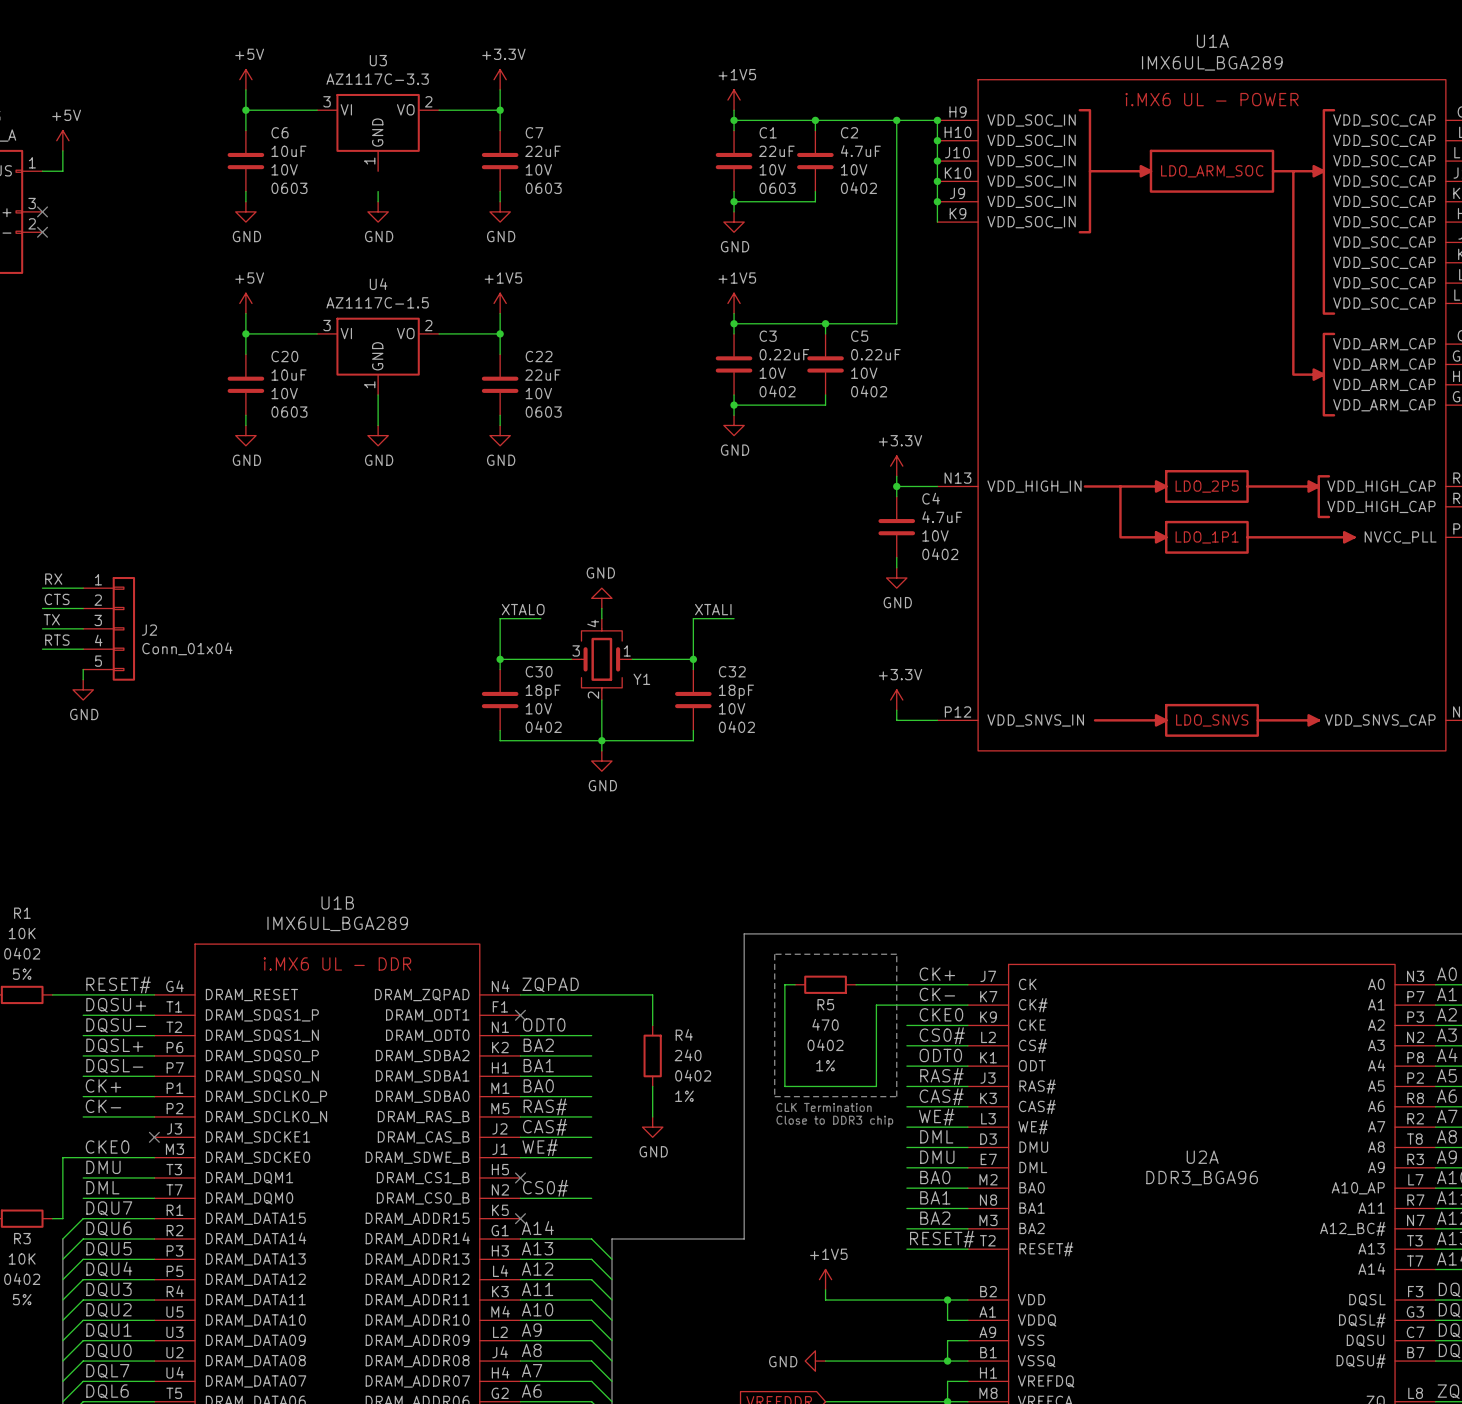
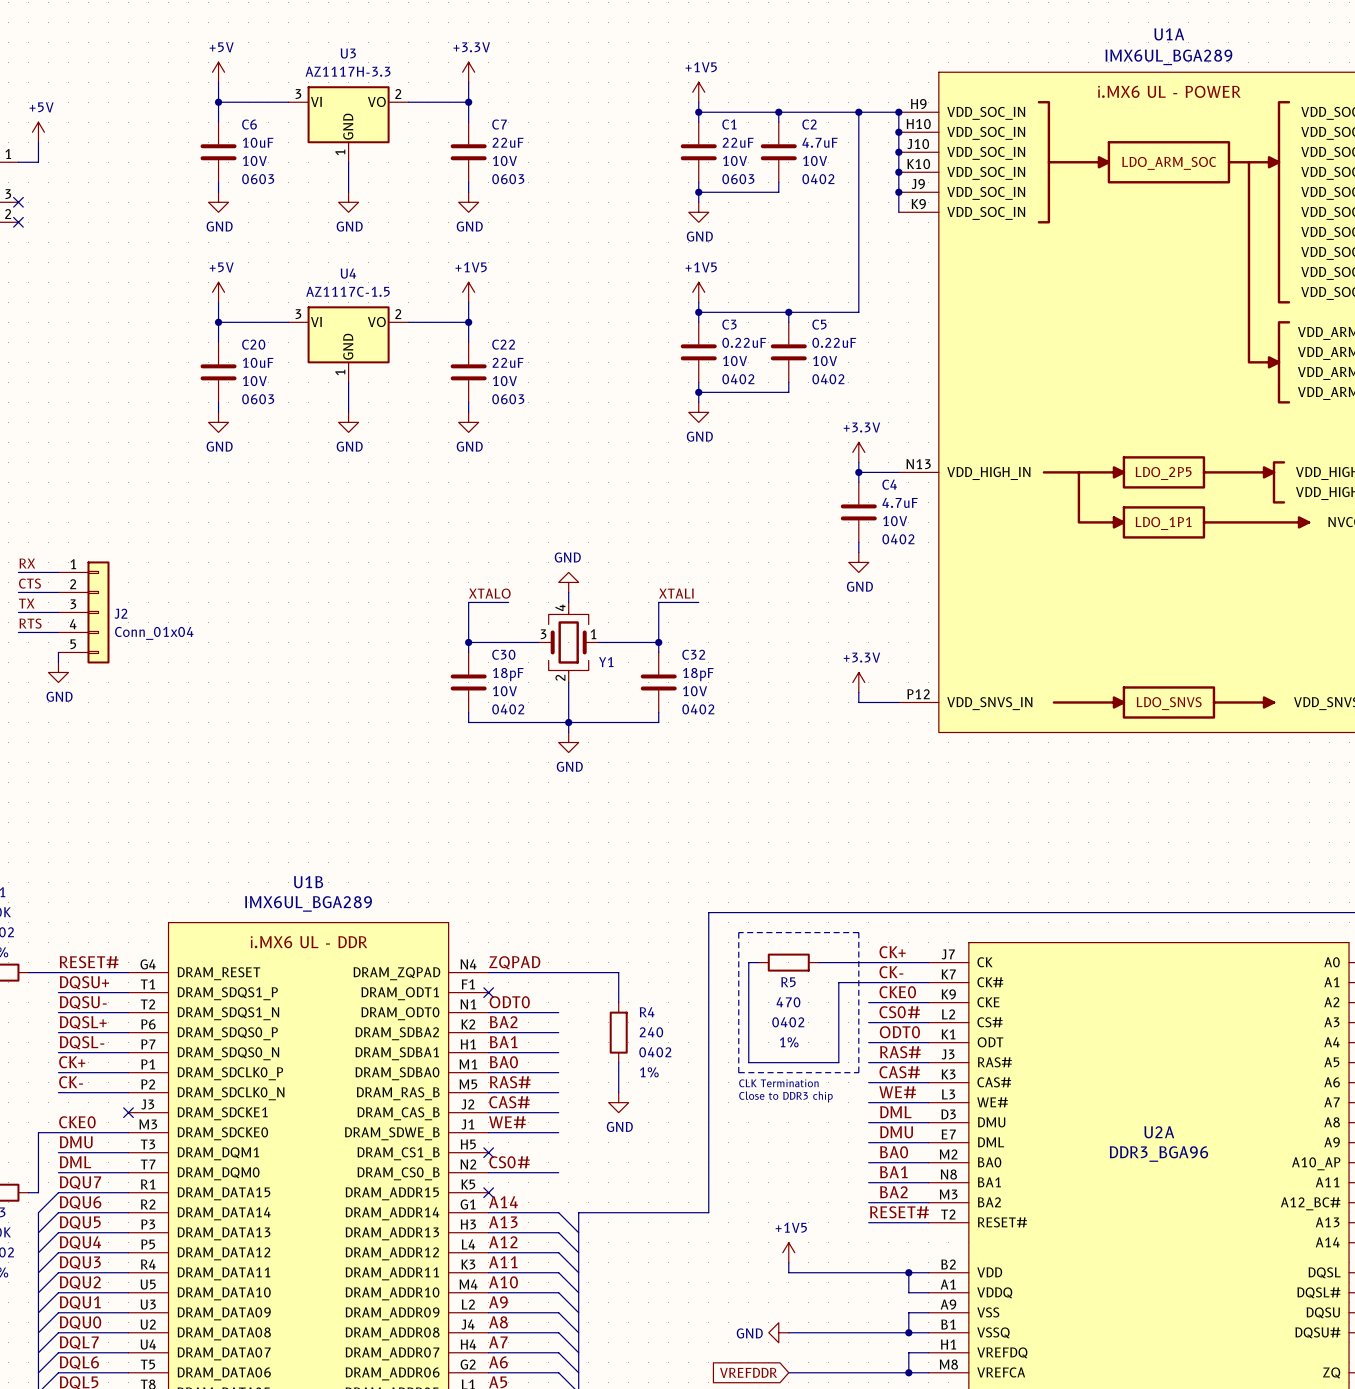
U3 value: AZ1117C-3.3 (377, 79) -> AZ1117H-3.3 (348, 71)
wire: none -> (348, 162) (348, 182)

